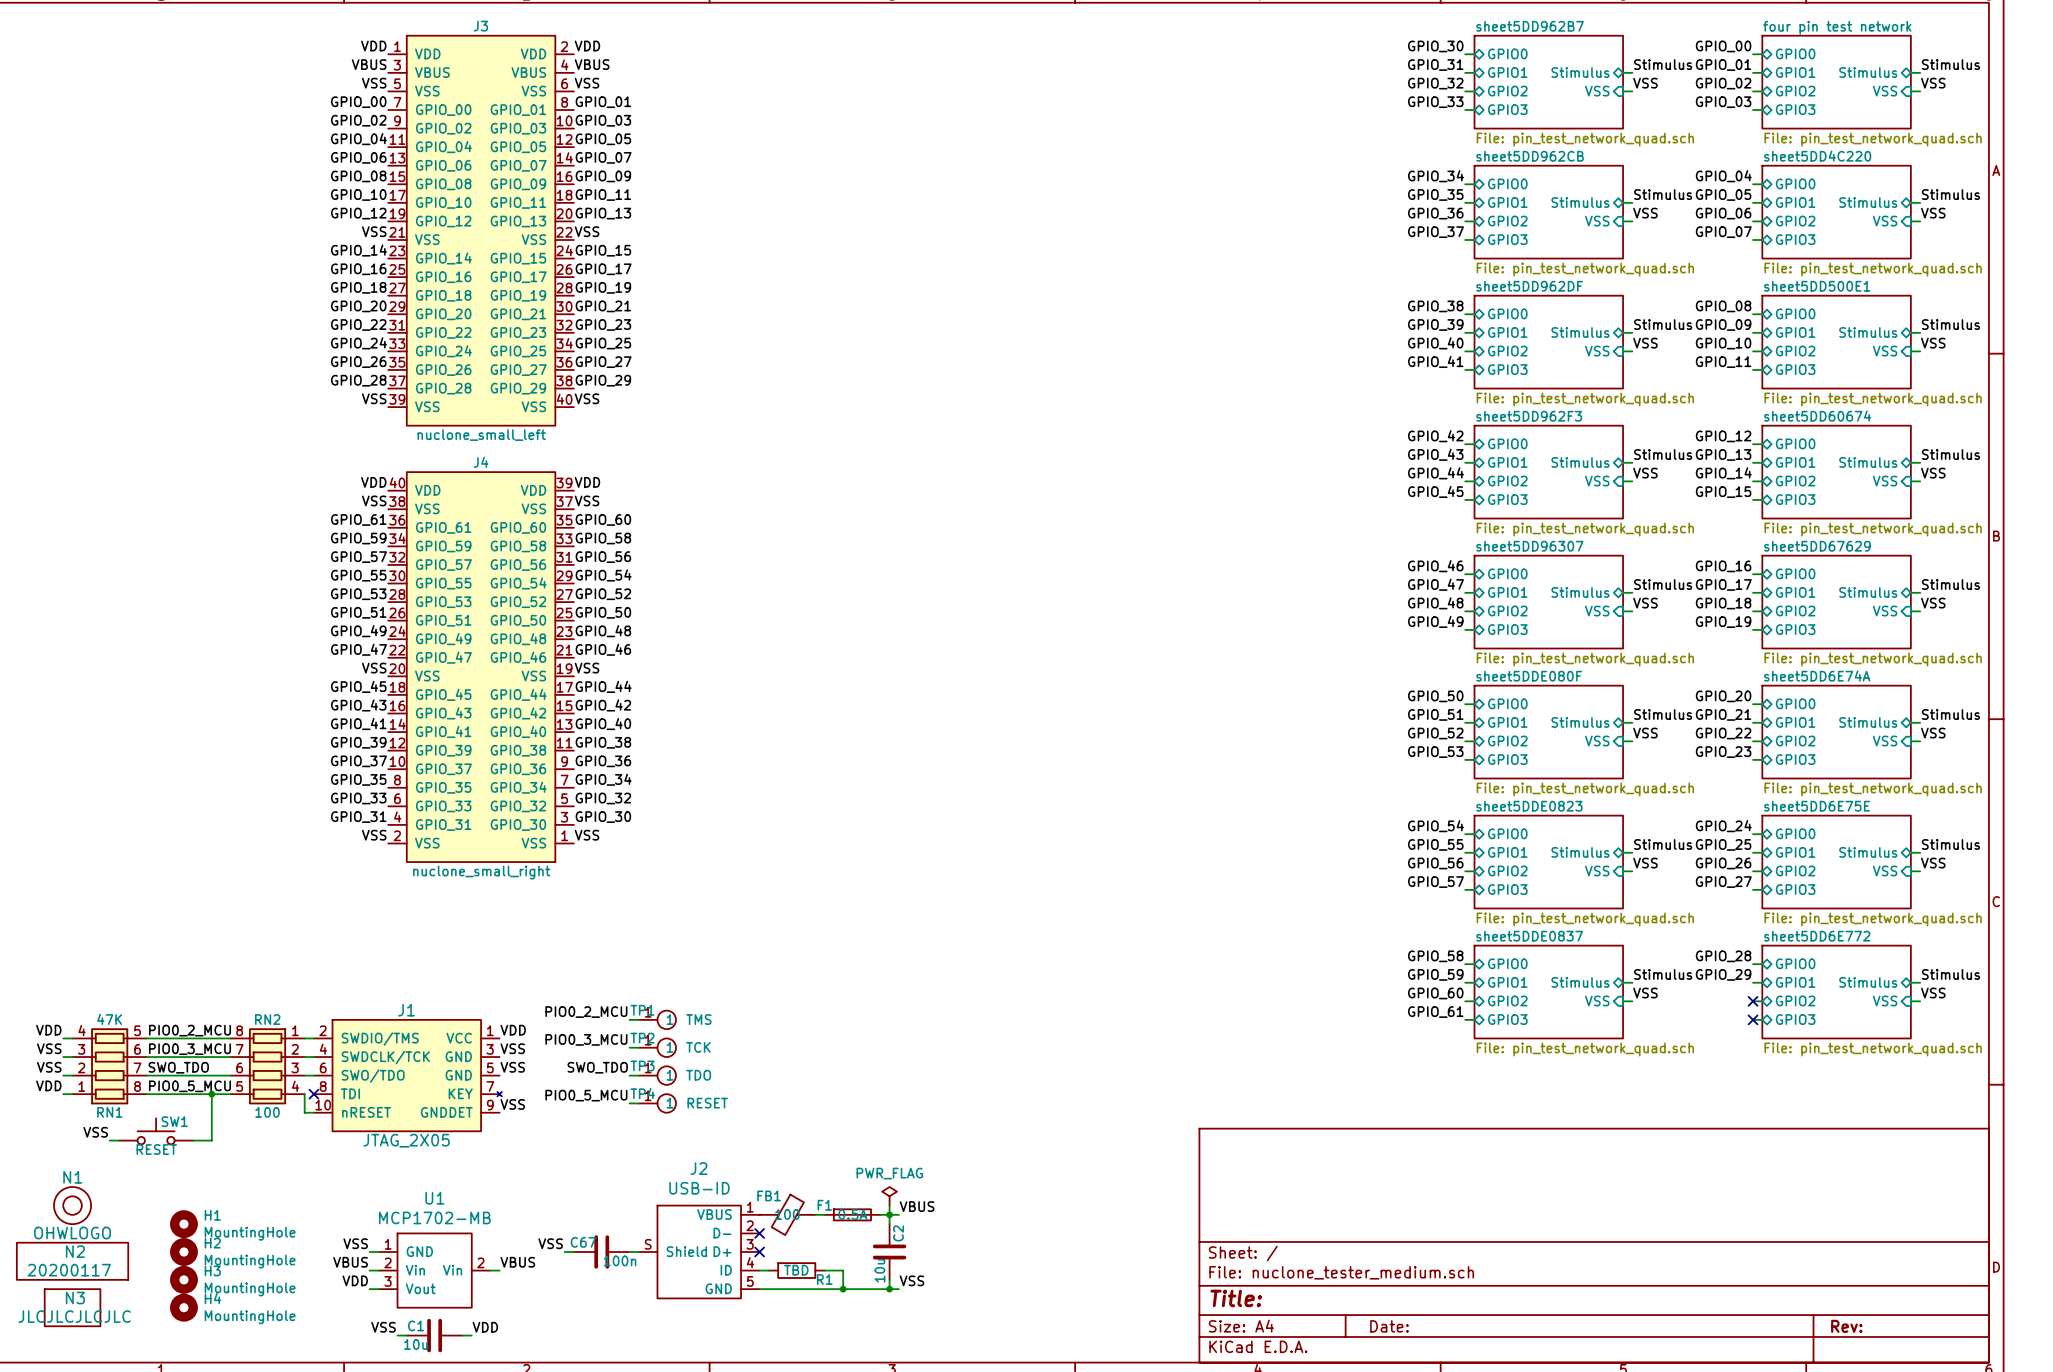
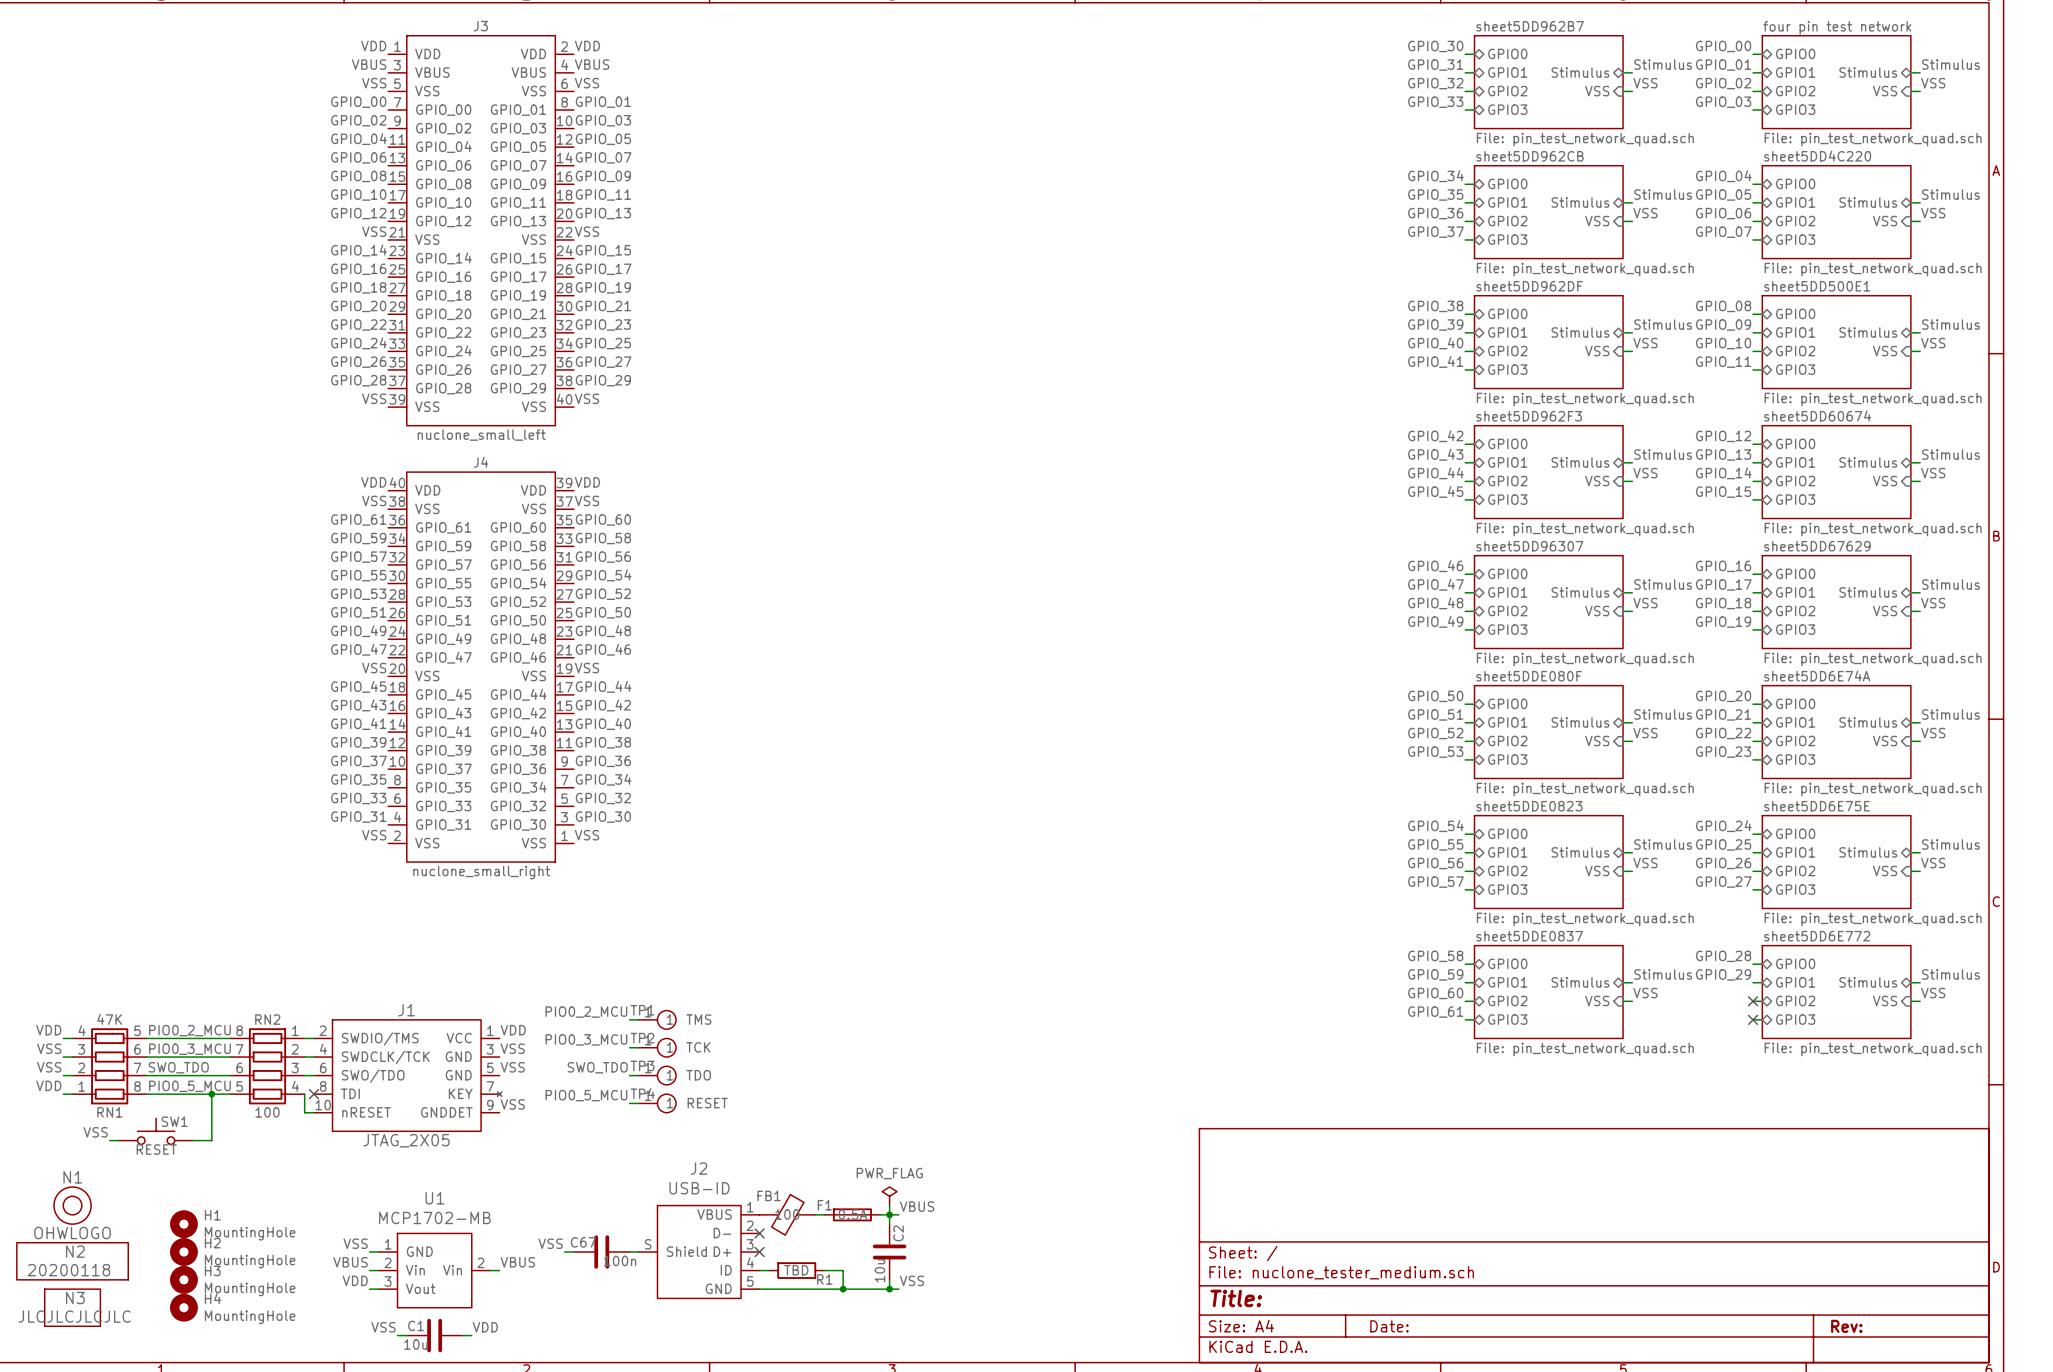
N2 value: 20200117 (69, 1270) -> 20200118 (69, 1270)

